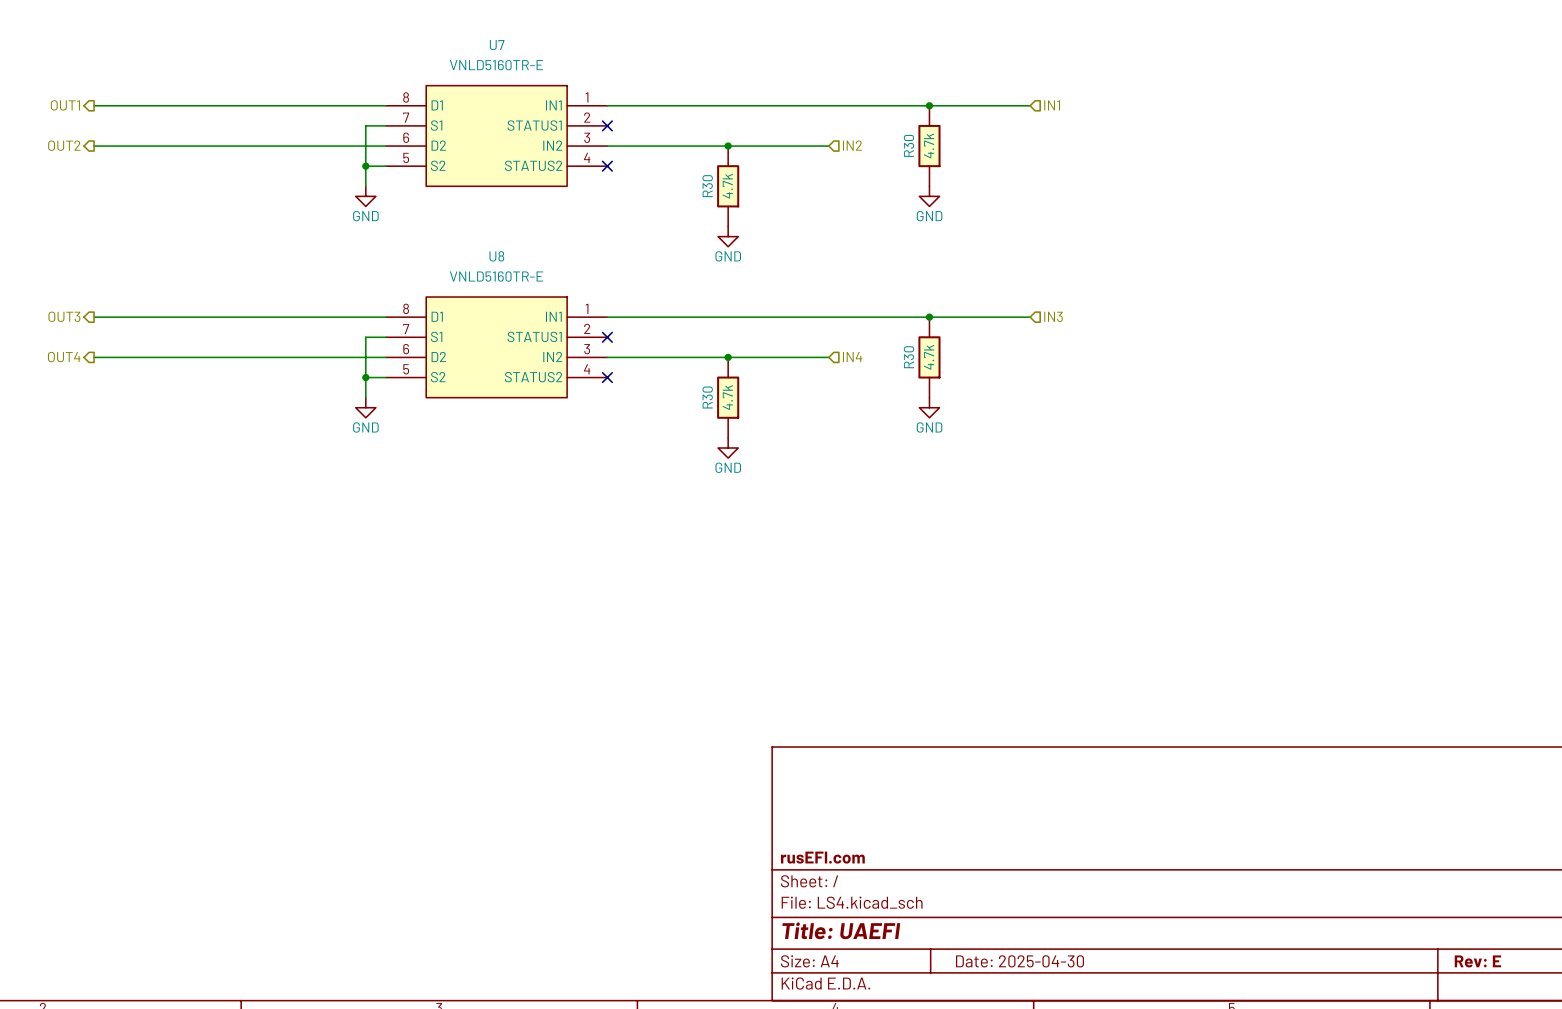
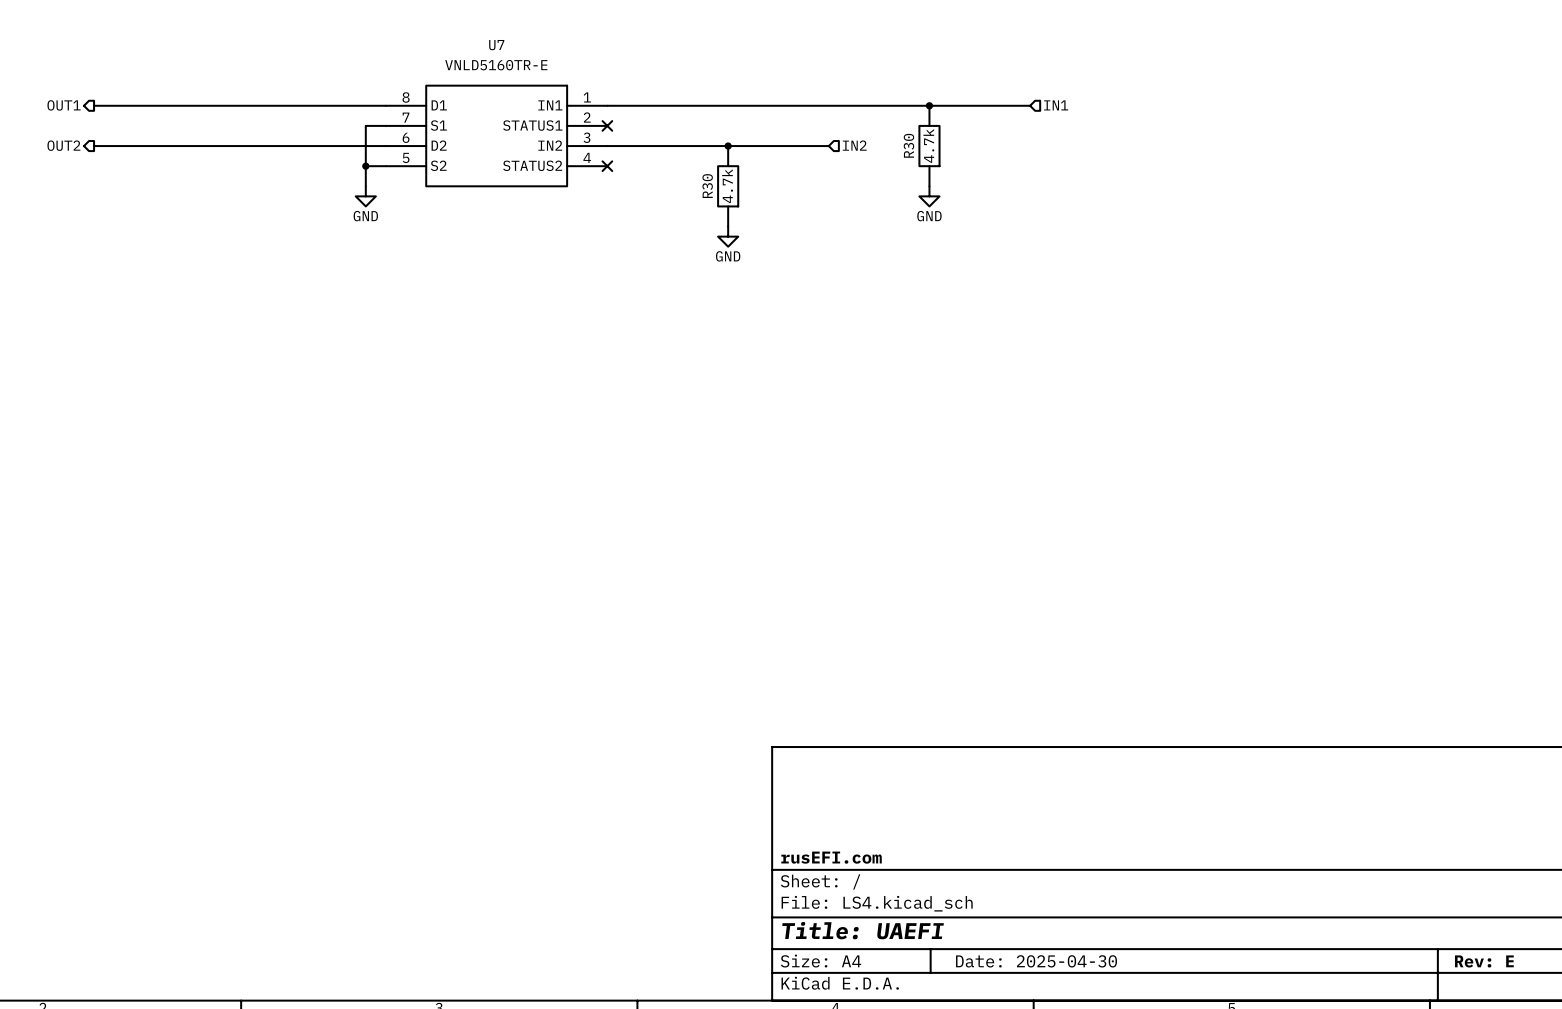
hierarchical label: OUT3 (64, 316) -> none
hierarchical label: IN3 (1053, 316) -> none
wire: (94, 317) (385, 317) -> none
wire: (607, 317) (1030, 317) -> none
junction: (929, 317) -> none
wire: (385, 337) (365, 337) (365, 397) -> none
no-connect mark: (607, 337) -> none
U8: VNLD5160TR-E (496, 347) -> none
hierarchical label: OUT4 (64, 357) -> none
wire: (94, 357) (385, 357) -> none
wire: (607, 357) (828, 357) -> none
junction: (728, 357) -> none
hierarchical label: IN4 (852, 357) -> none
R30: 4.7k (929, 357) -> none
wire: (365, 377) (385, 377) -> none
junction: (365, 377) -> none
no-connect mark: (607, 377) -> none
R30: 4.7k (728, 397) -> none
power symbol: GND (365, 407) -> none
power symbol: GND (929, 407) -> none
power symbol: GND (728, 448) -> none

